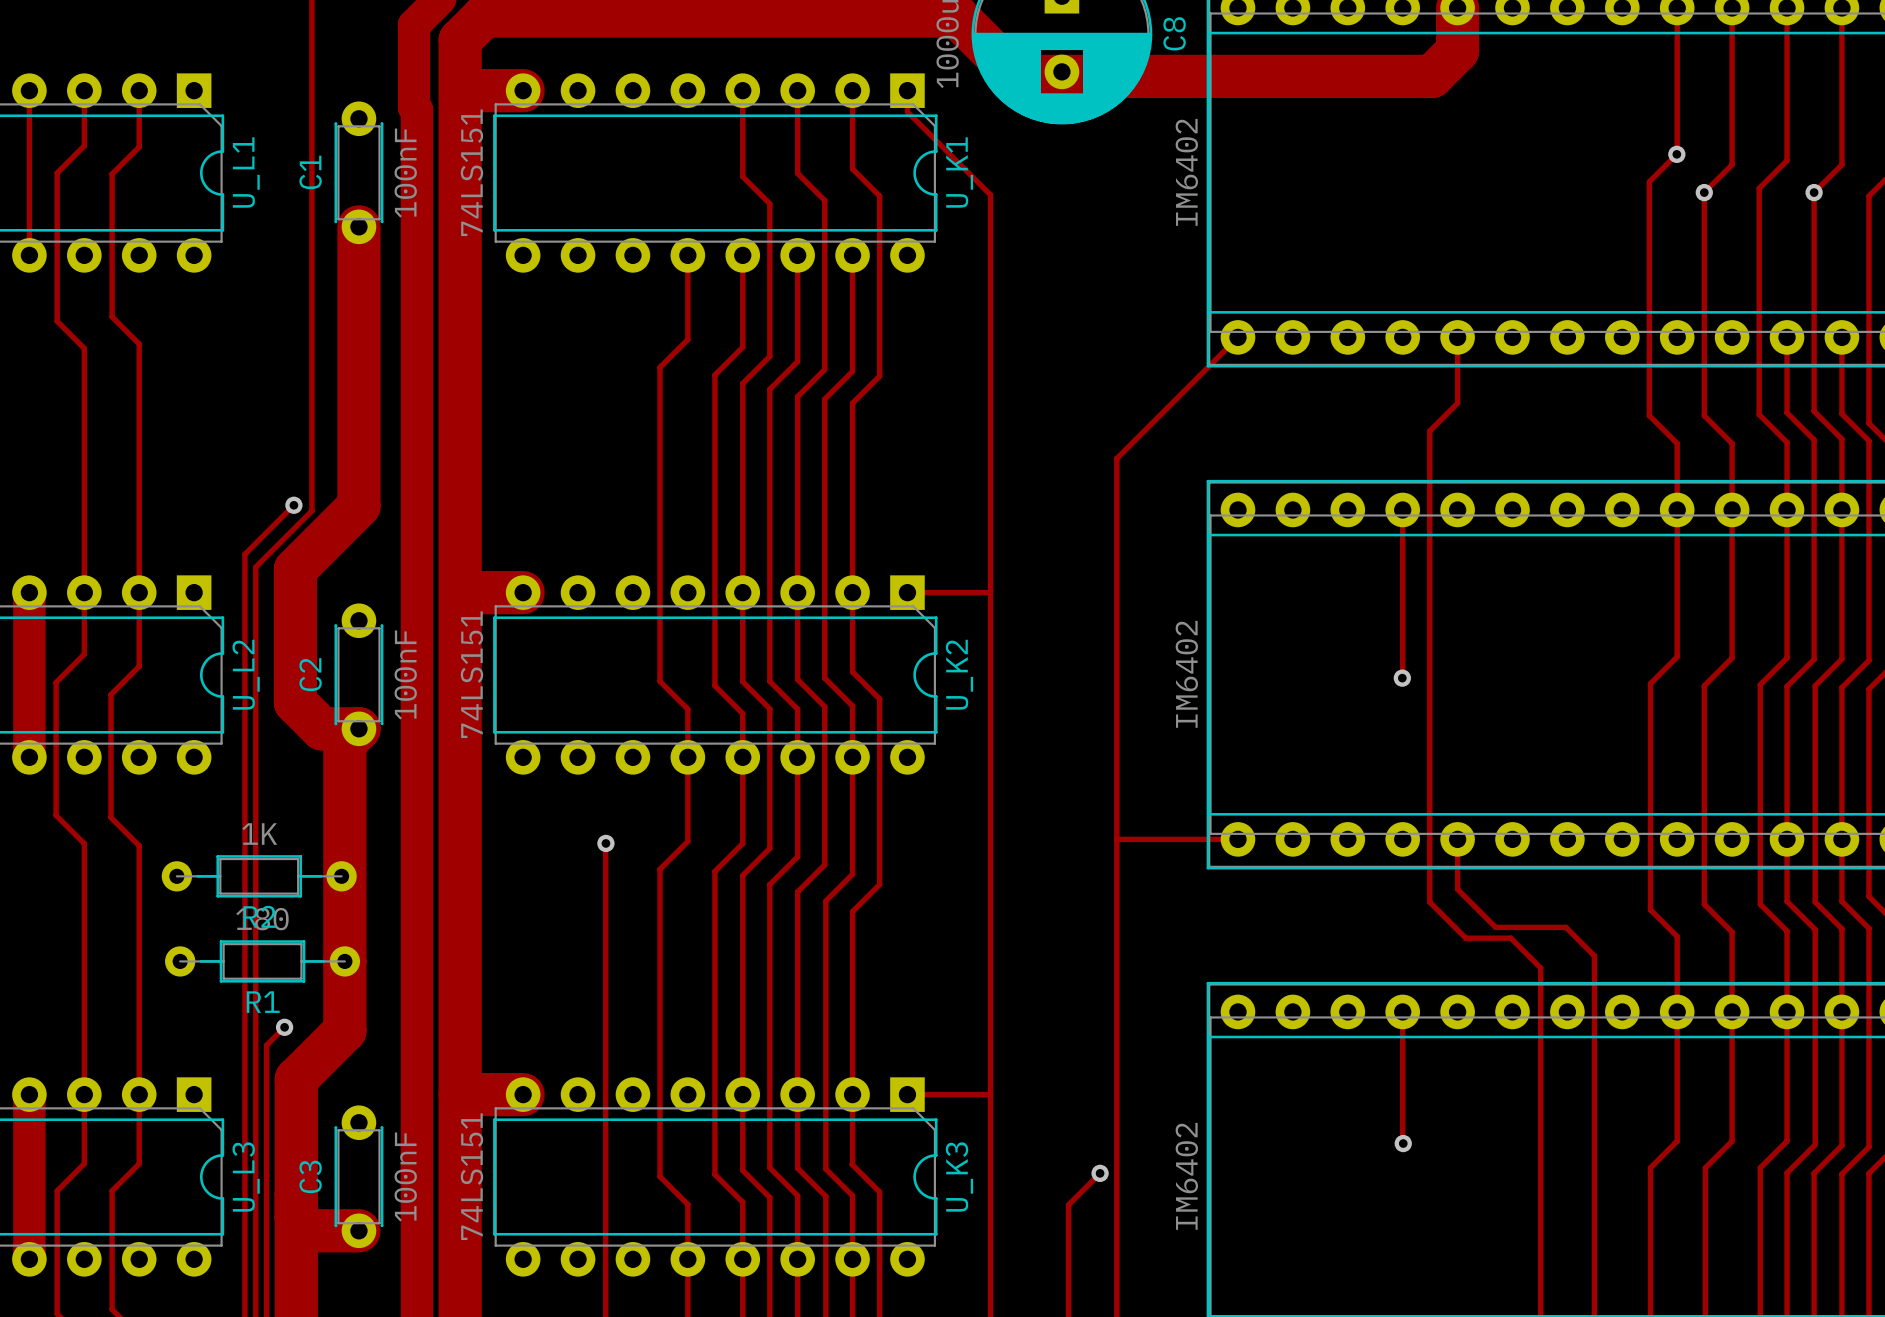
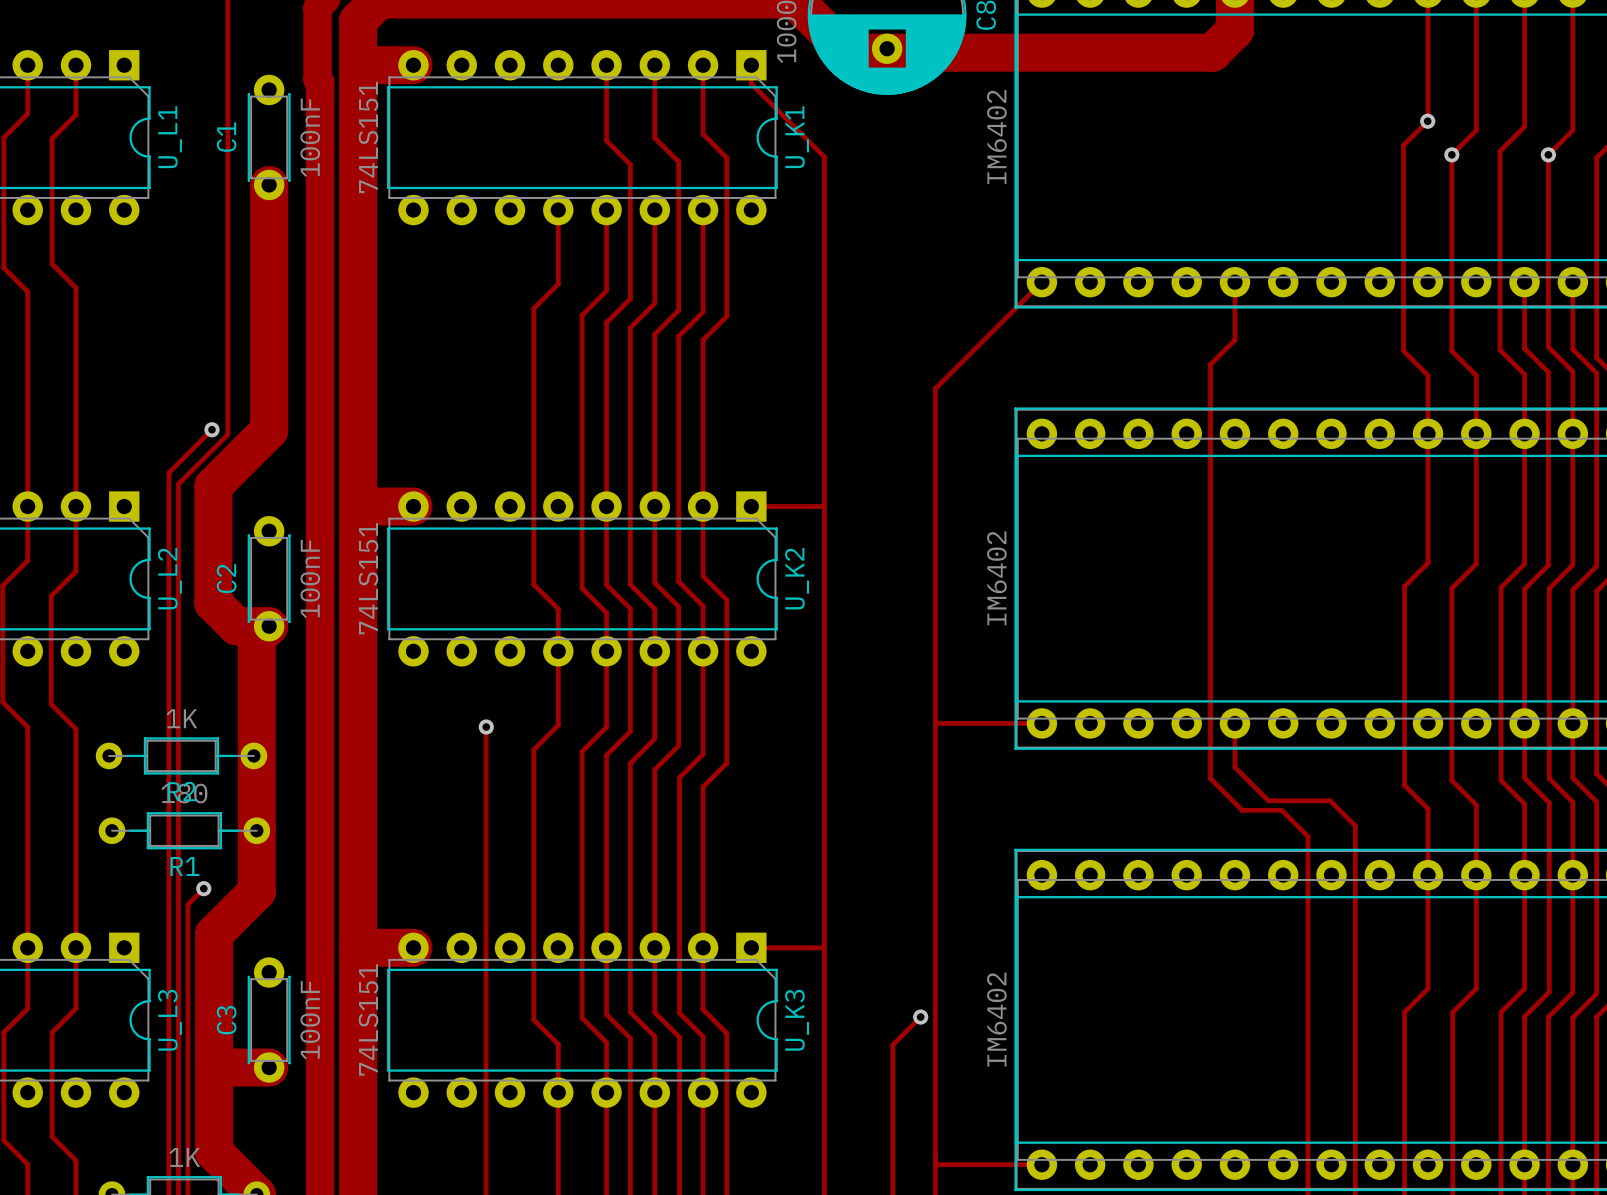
track: (1402, 509) (1402, 678) -> none
via: (1402, 678) -> none
track: (1402, 1011) (1402, 1142) -> none
via: (1403, 1143) -> none

